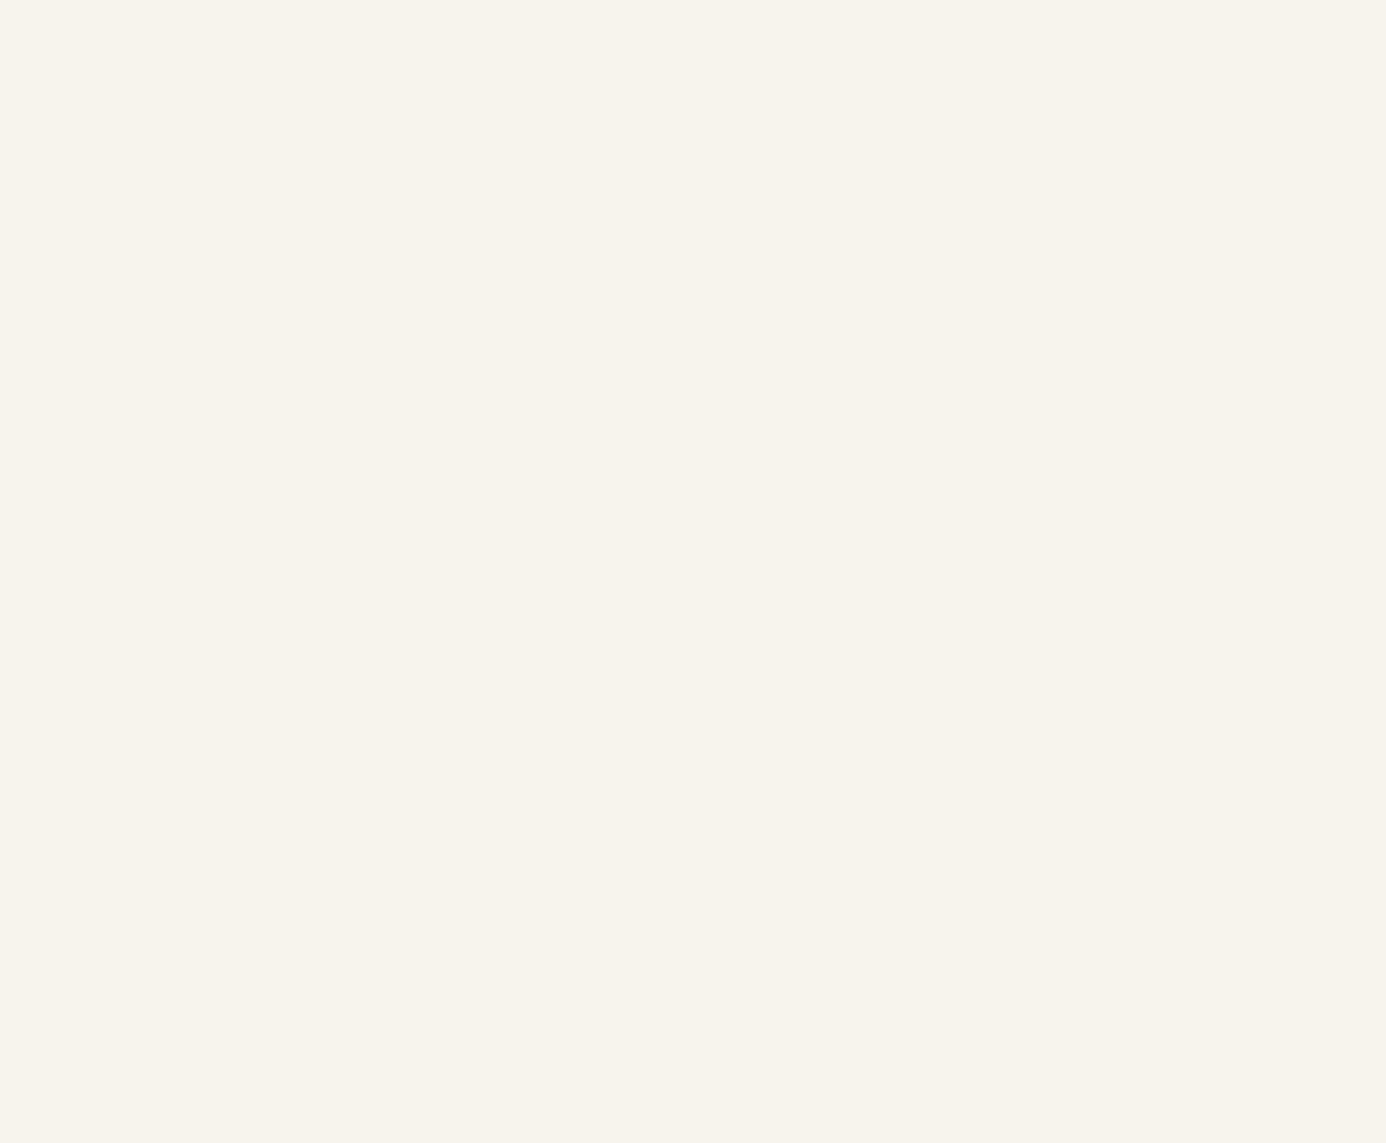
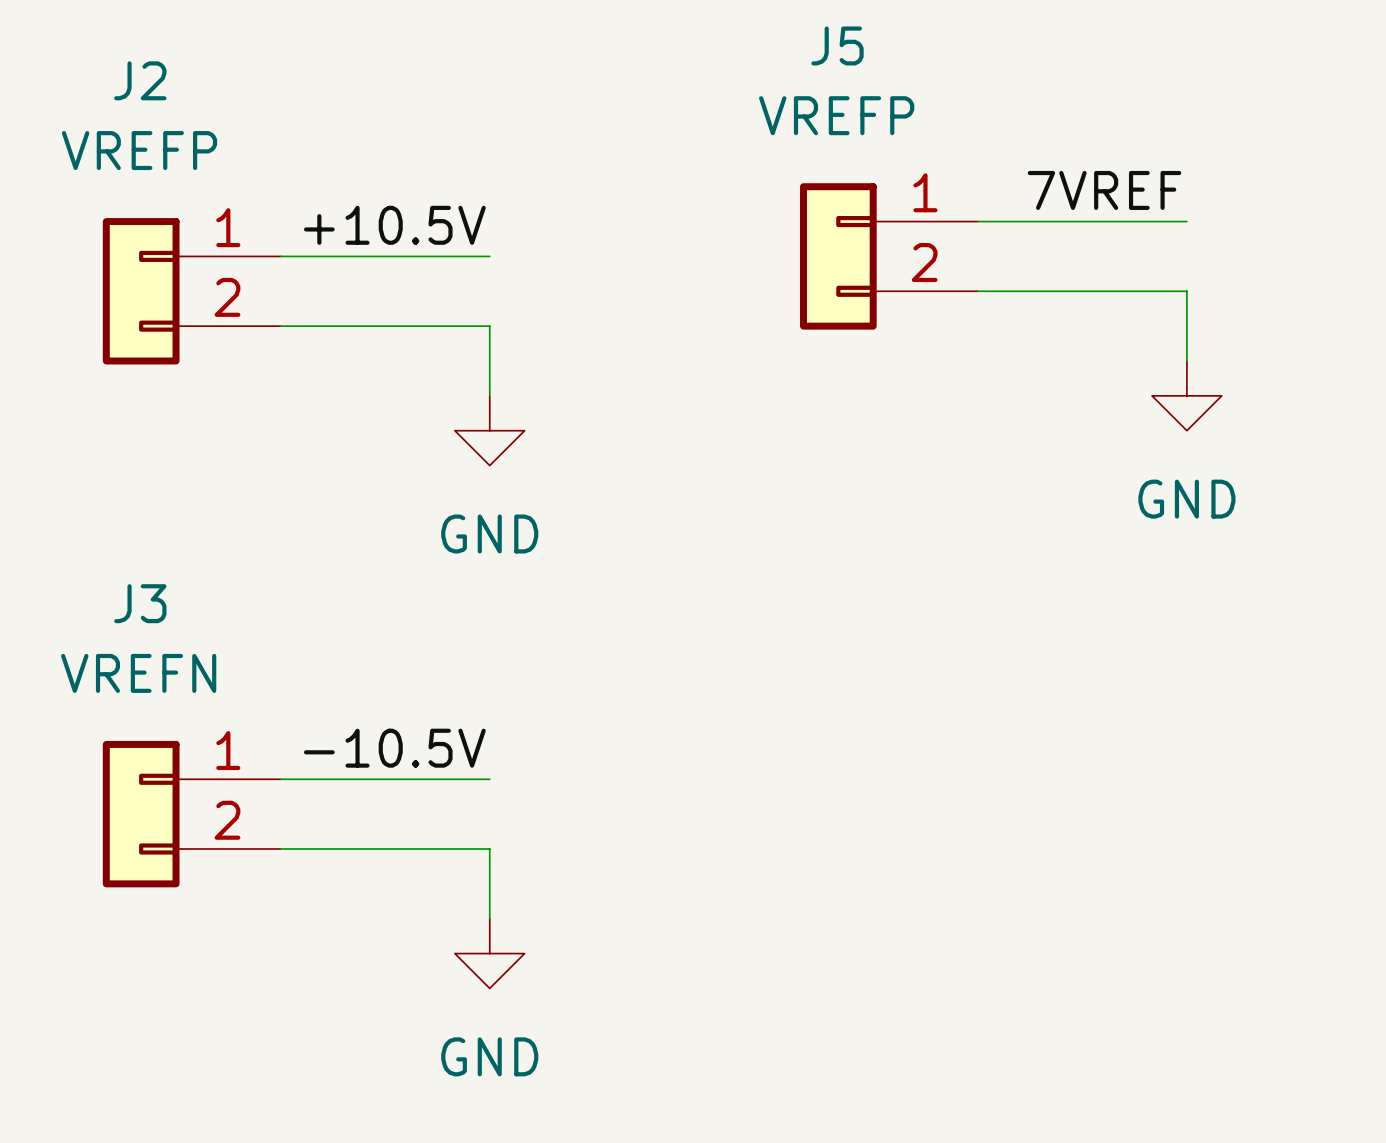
label: none -> 7VREF (1104, 190)
wire: none -> (977, 221) (1186, 221)
label: none -> +10.5V (394, 225)
wire: none -> (280, 256) (489, 256)
J5: none -> VREFP (888, 256)
J2: none -> VREFP (191, 291)
wire: none -> (977, 291) (1186, 291) (1186, 360)
wire: none -> (280, 326) (489, 326) (489, 395)
power symbol: none -> GND (1186, 395)
power symbol: none -> GND (489, 430)
label: none -> -10.5V (394, 748)
wire: none -> (280, 779) (489, 779)
J3: none -> VREFN (191, 814)
wire: none -> (280, 849) (489, 849) (489, 918)
power symbol: none -> GND (489, 953)

